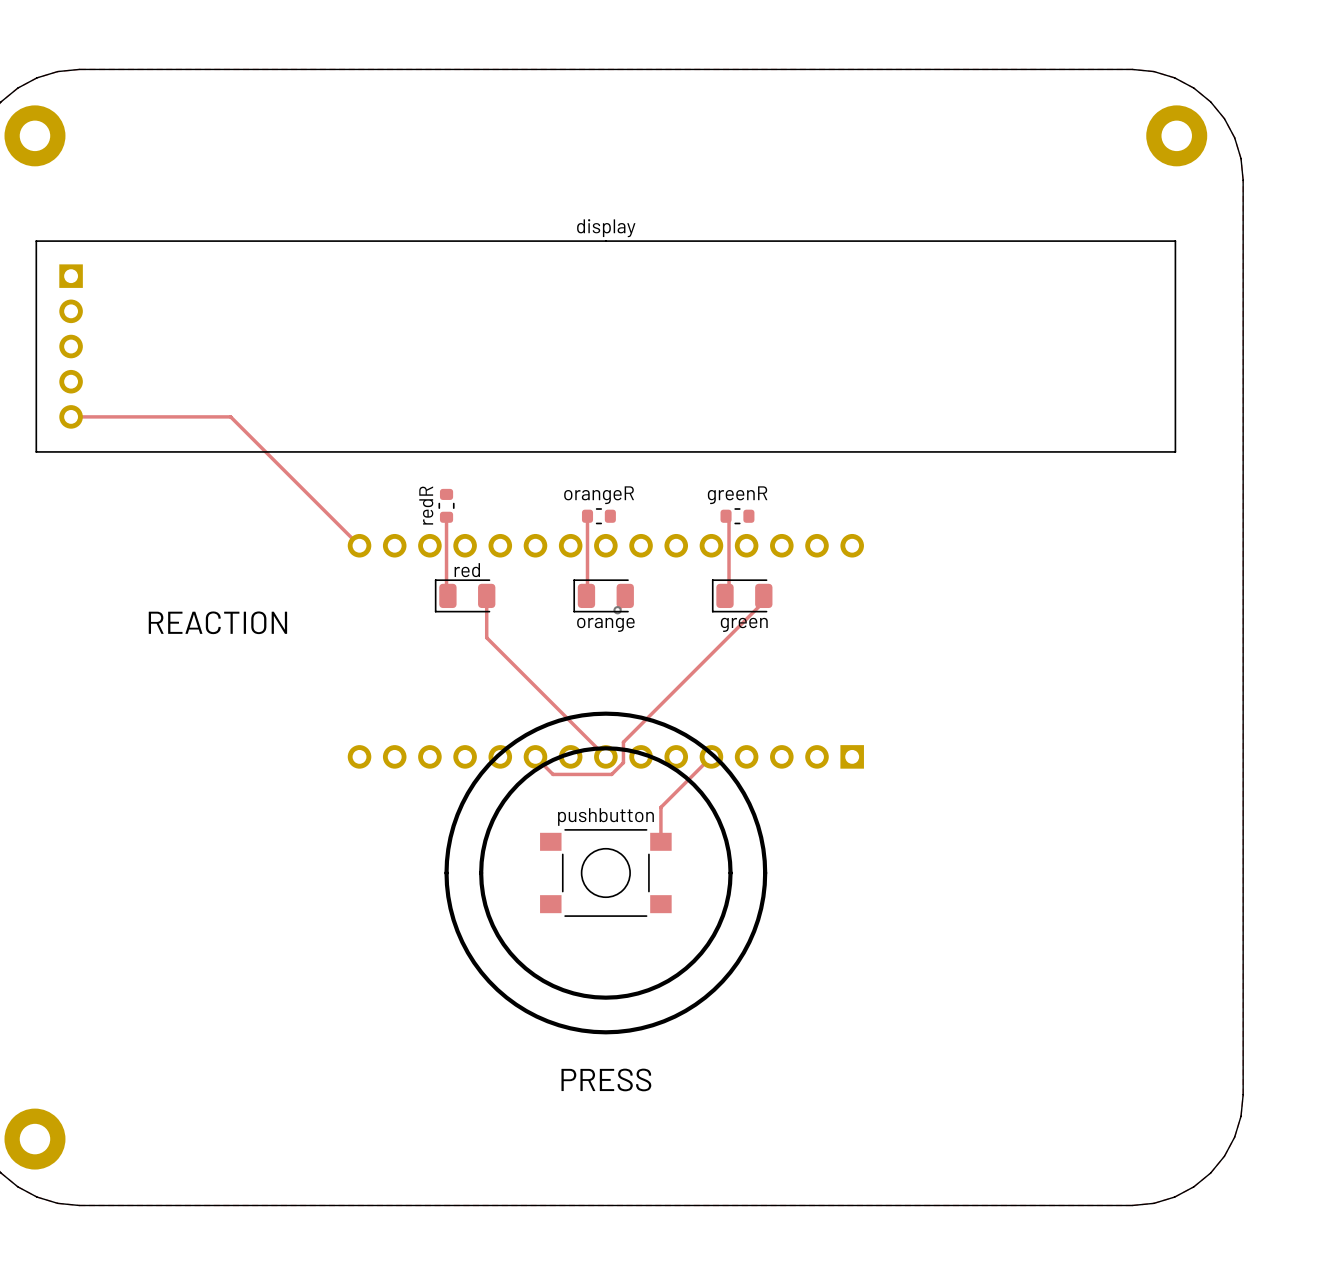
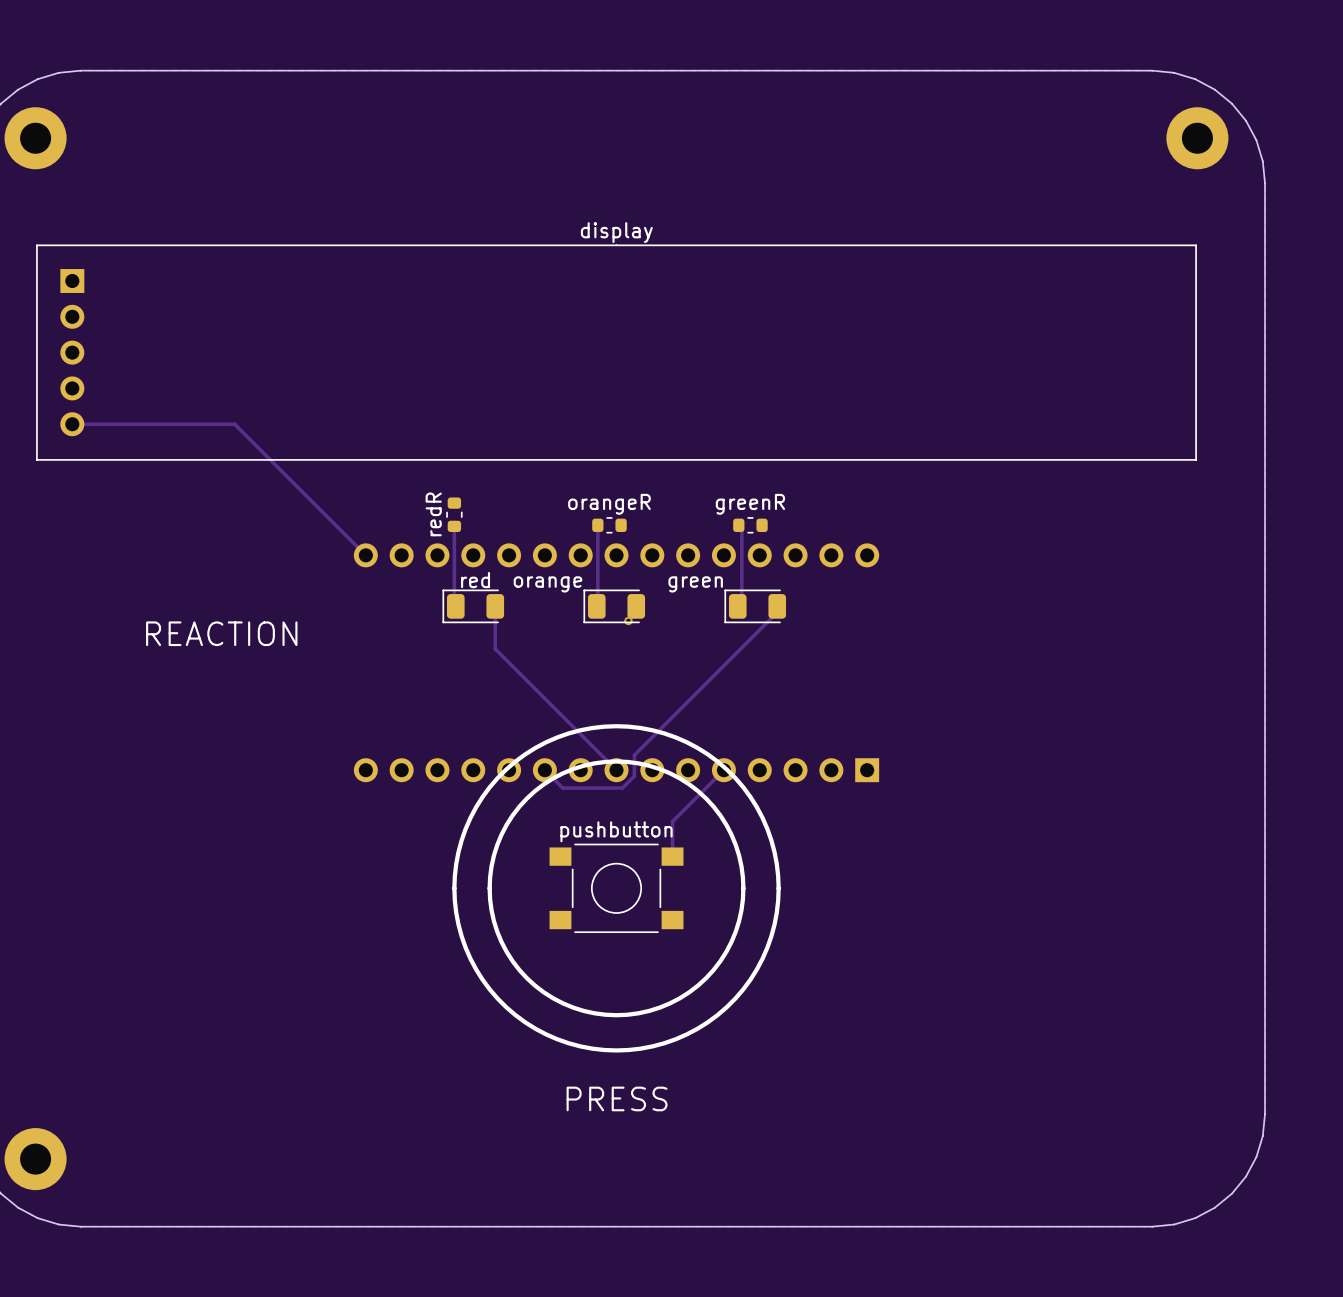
orange name position: orange (605, 624) -> orange (547, 584)
green name position: green (744, 624) -> green (695, 584)

